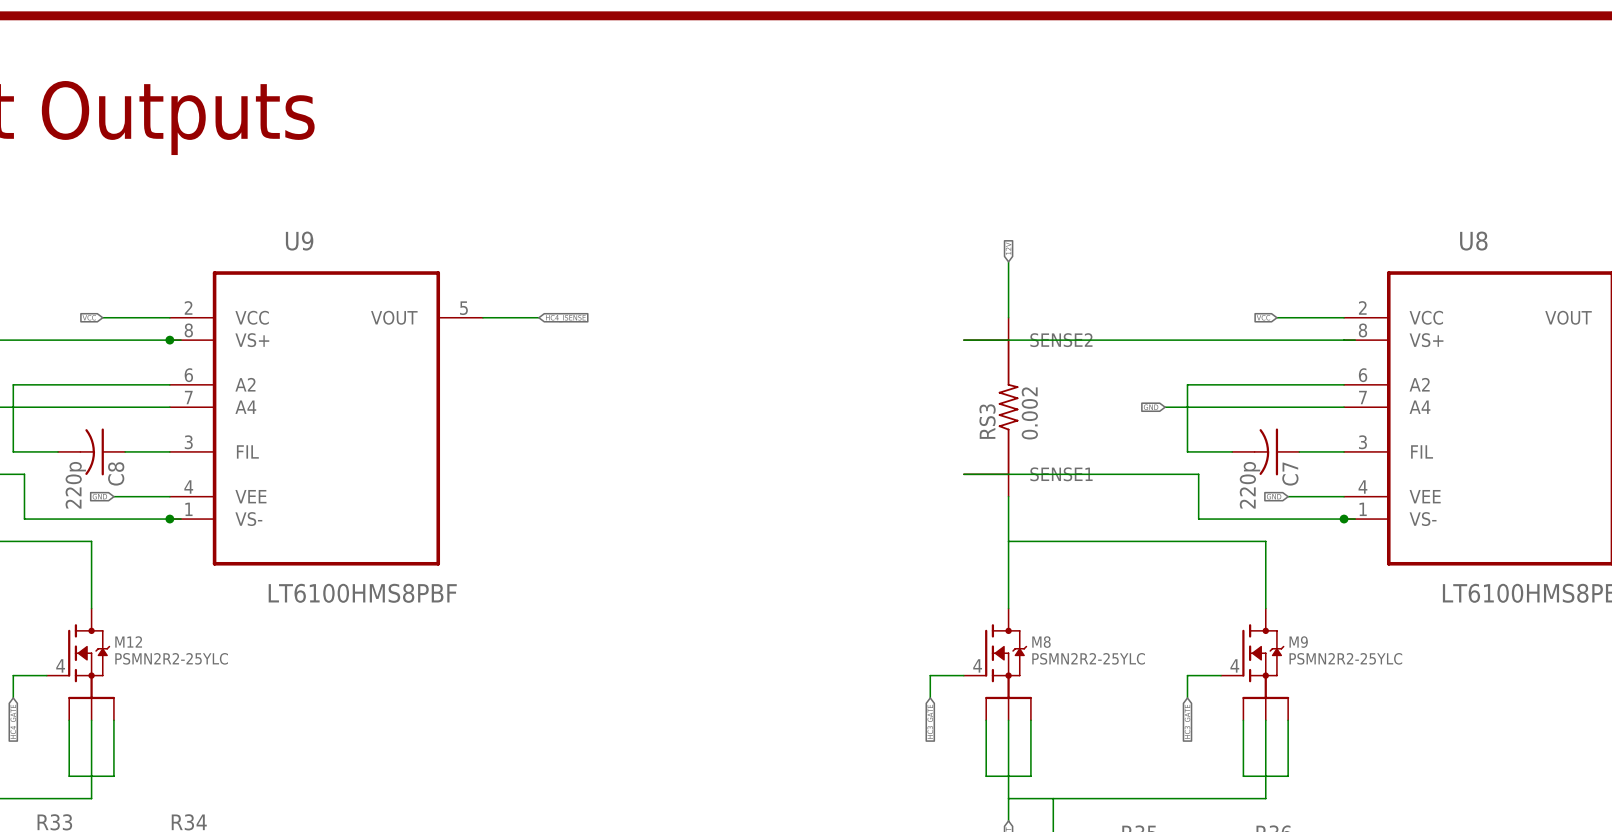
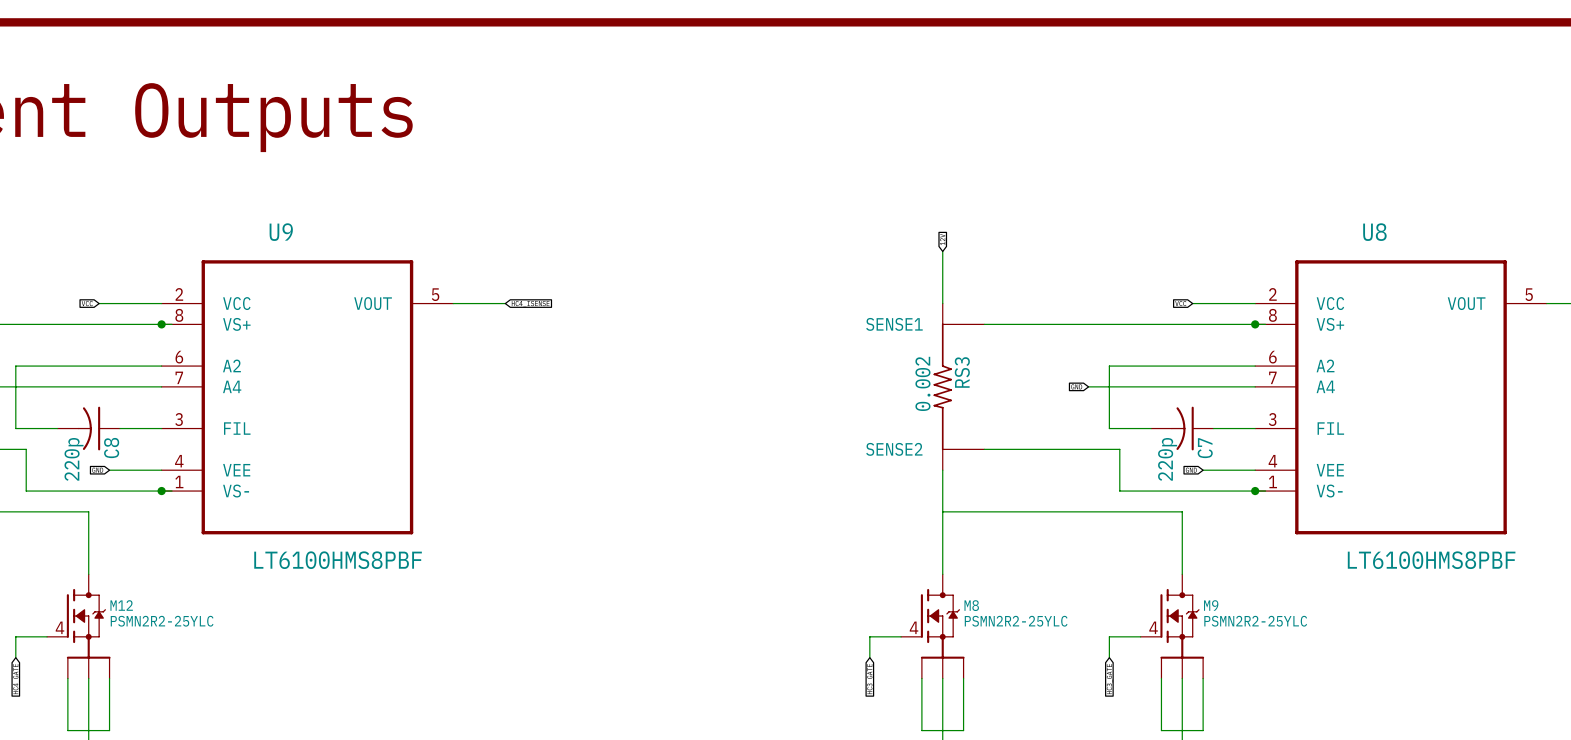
junction: none -> (1255, 324)
RS3 rotation: 0° (1008, 407) -> 180° (942, 386)

